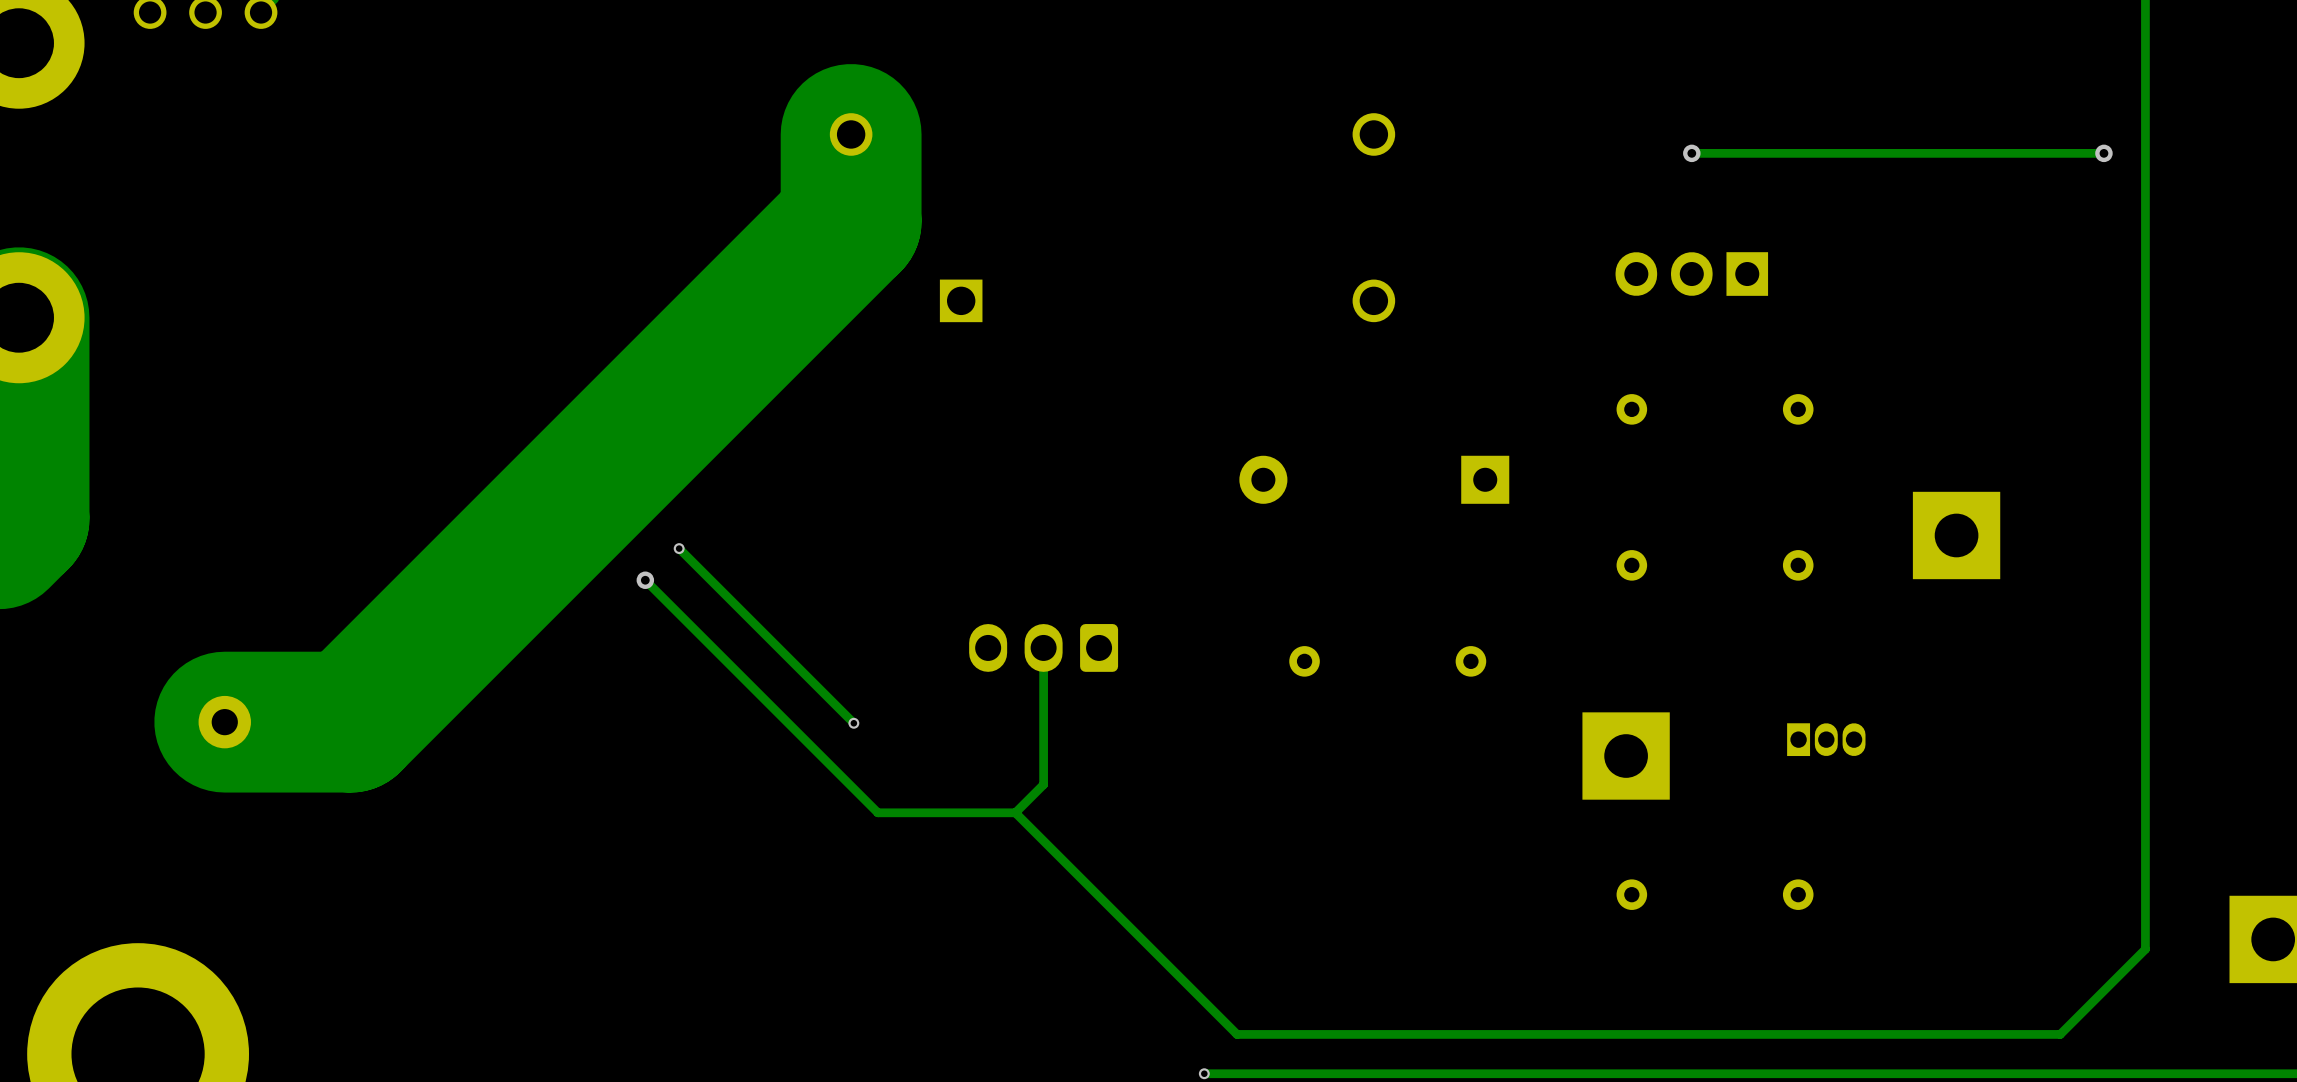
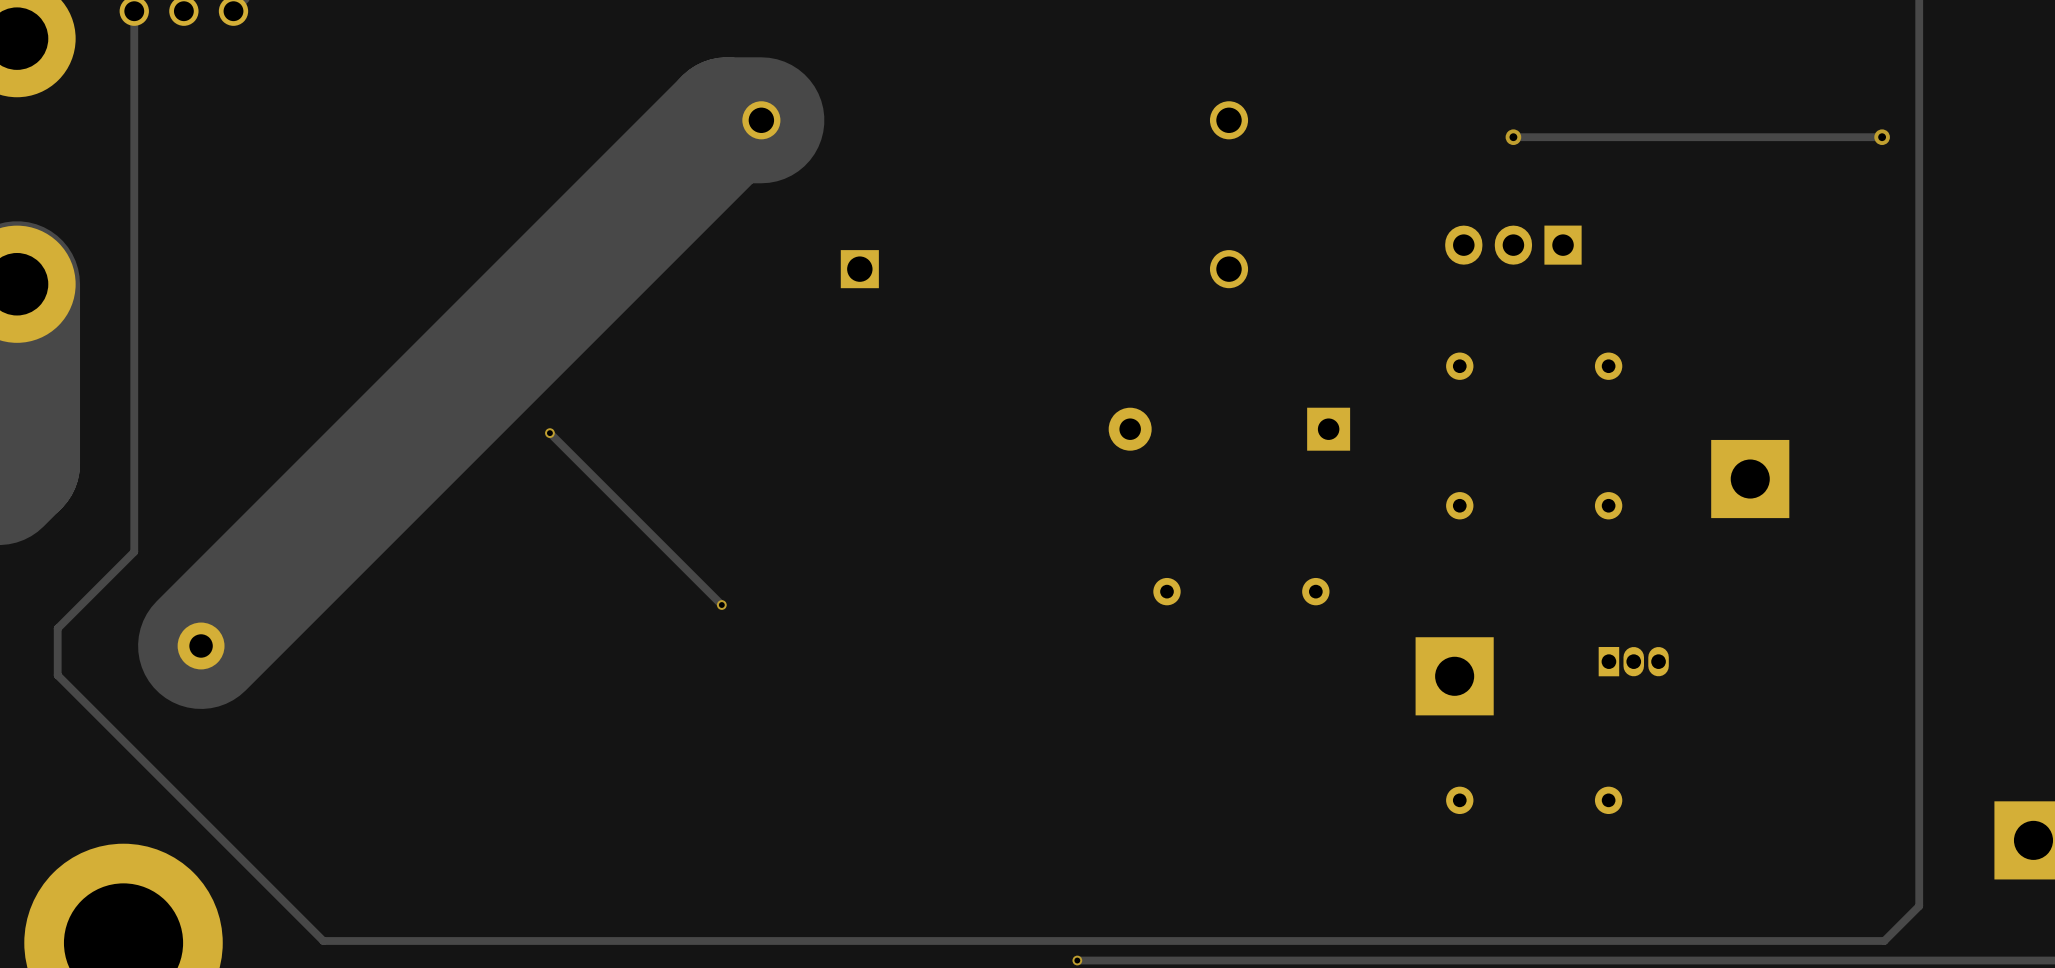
track: (851, 134) (851, 221) (350, 722) (224, 722) -> (761, 120) (726, 120) (201, 645)
track: none -> (549, 433) (607, 490)
via: none -> (549, 433)
via: (679, 548) -> none
track: (645, 580) (877, 812) (1015, 812) -> none
via: (645, 580) -> none
track: (1043, 647) (1043, 784) (1015, 812) -> none
part: (1043, 647) -> none
track: (806, 676) (853, 723) -> none
via position: (853, 723) -> (721, 605)
track: (1015, 812) (1237, 1034) (2060, 1034) (2145, 949) -> (134, 11) (134, 551) (57, 628) (57, 675) (323, 940) (1884, 940) (1919, 906) (1919, 849)

